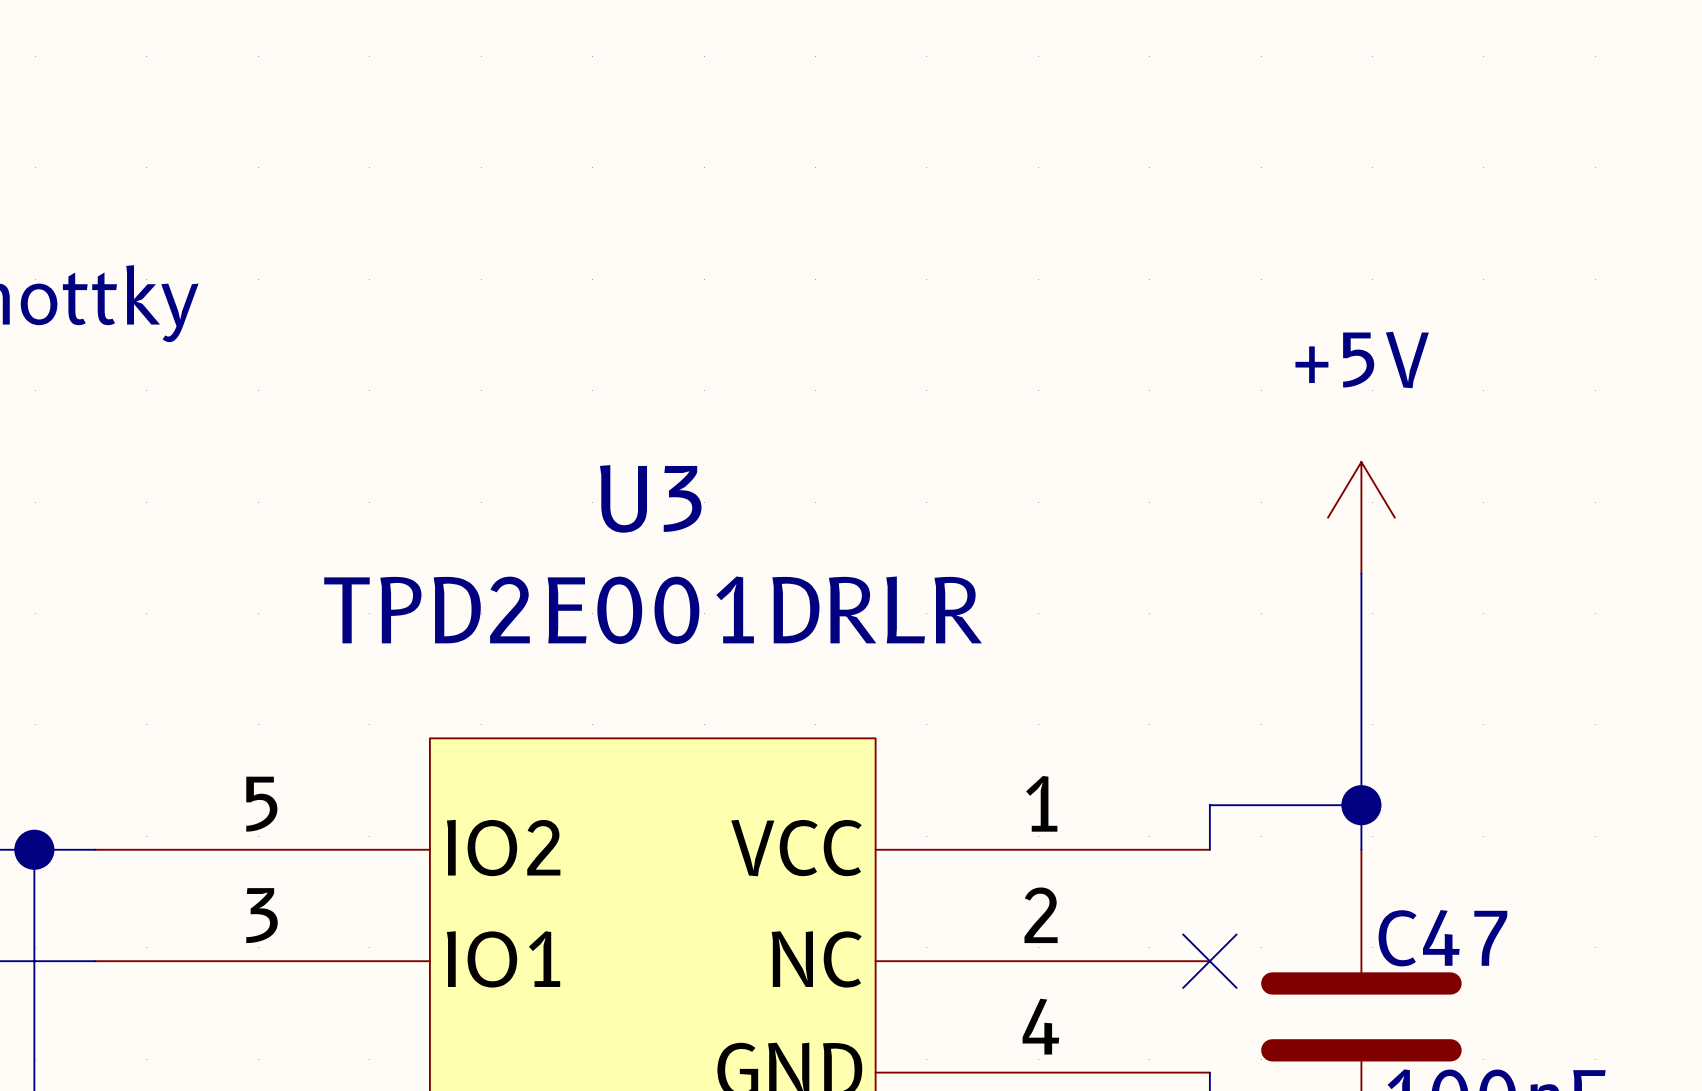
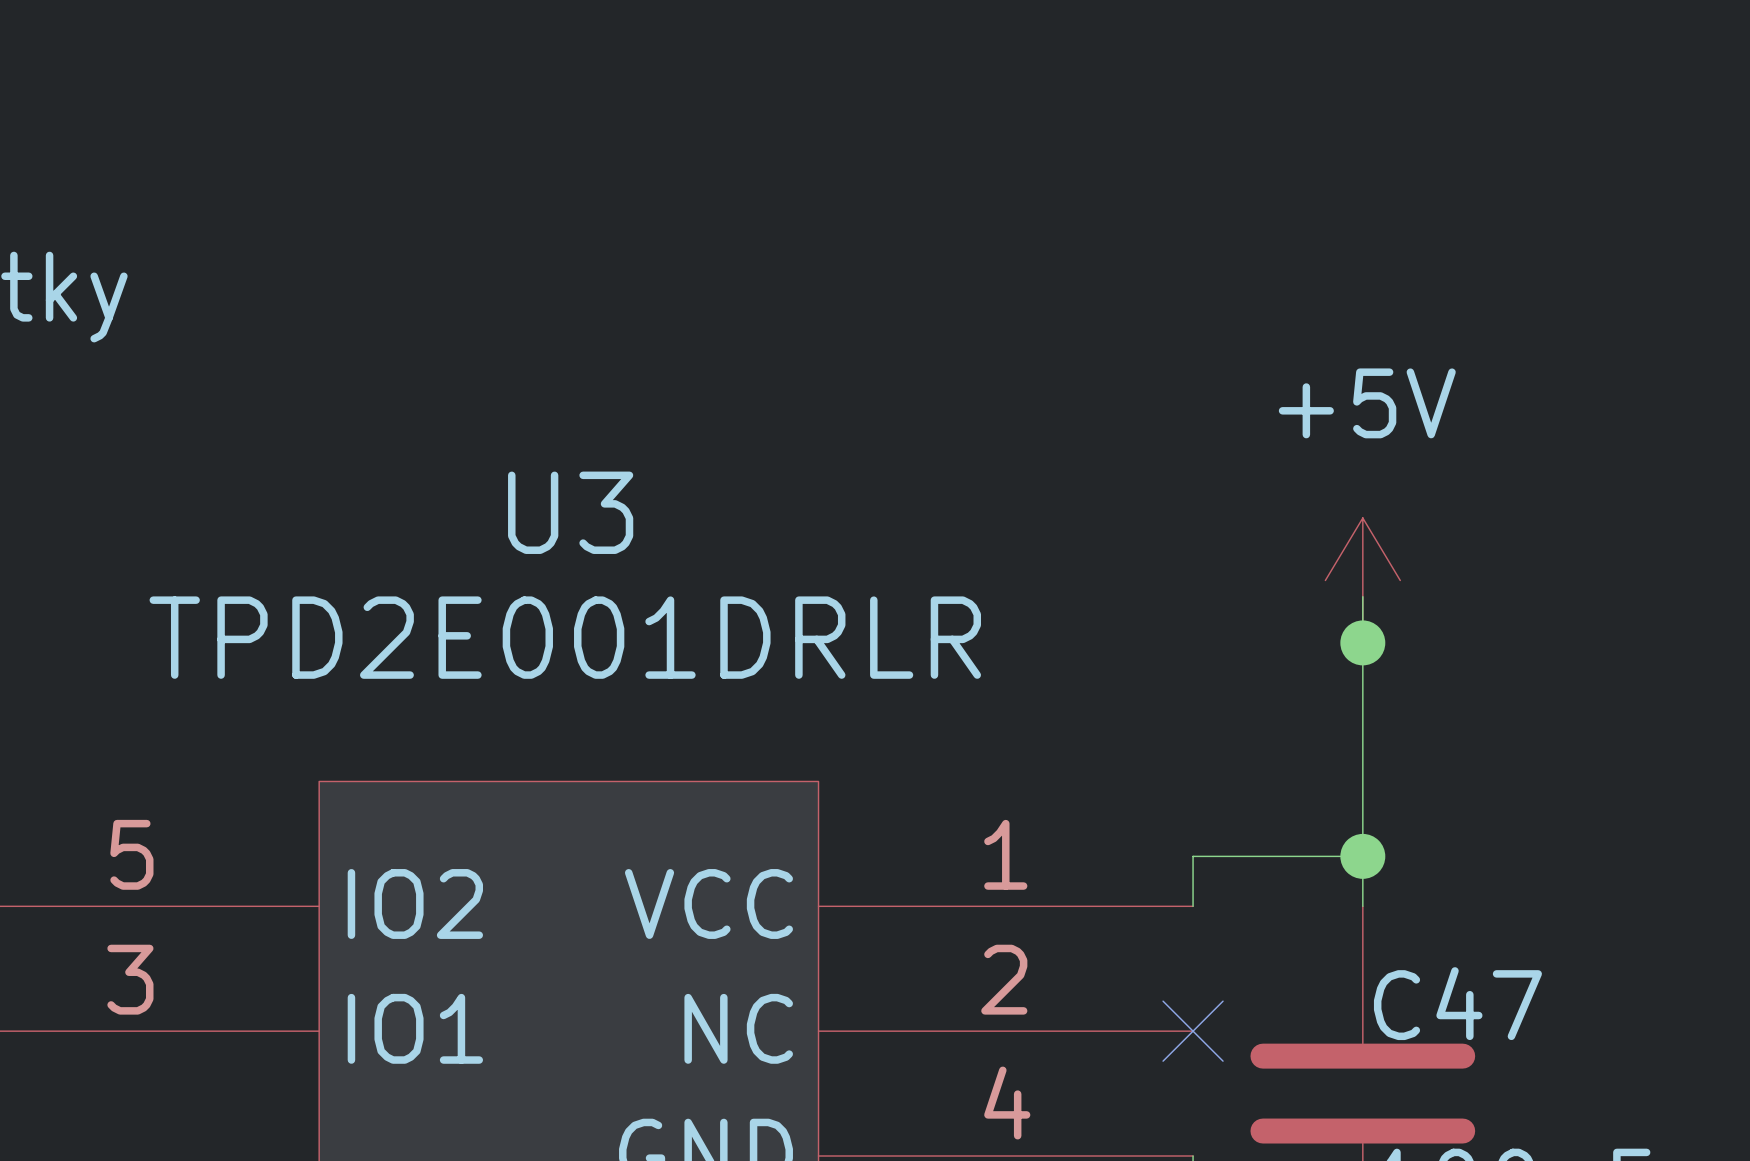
power symbol position: +5V (1361, 517) -> +5V (1362, 580)
junction: none -> (1362, 642)

